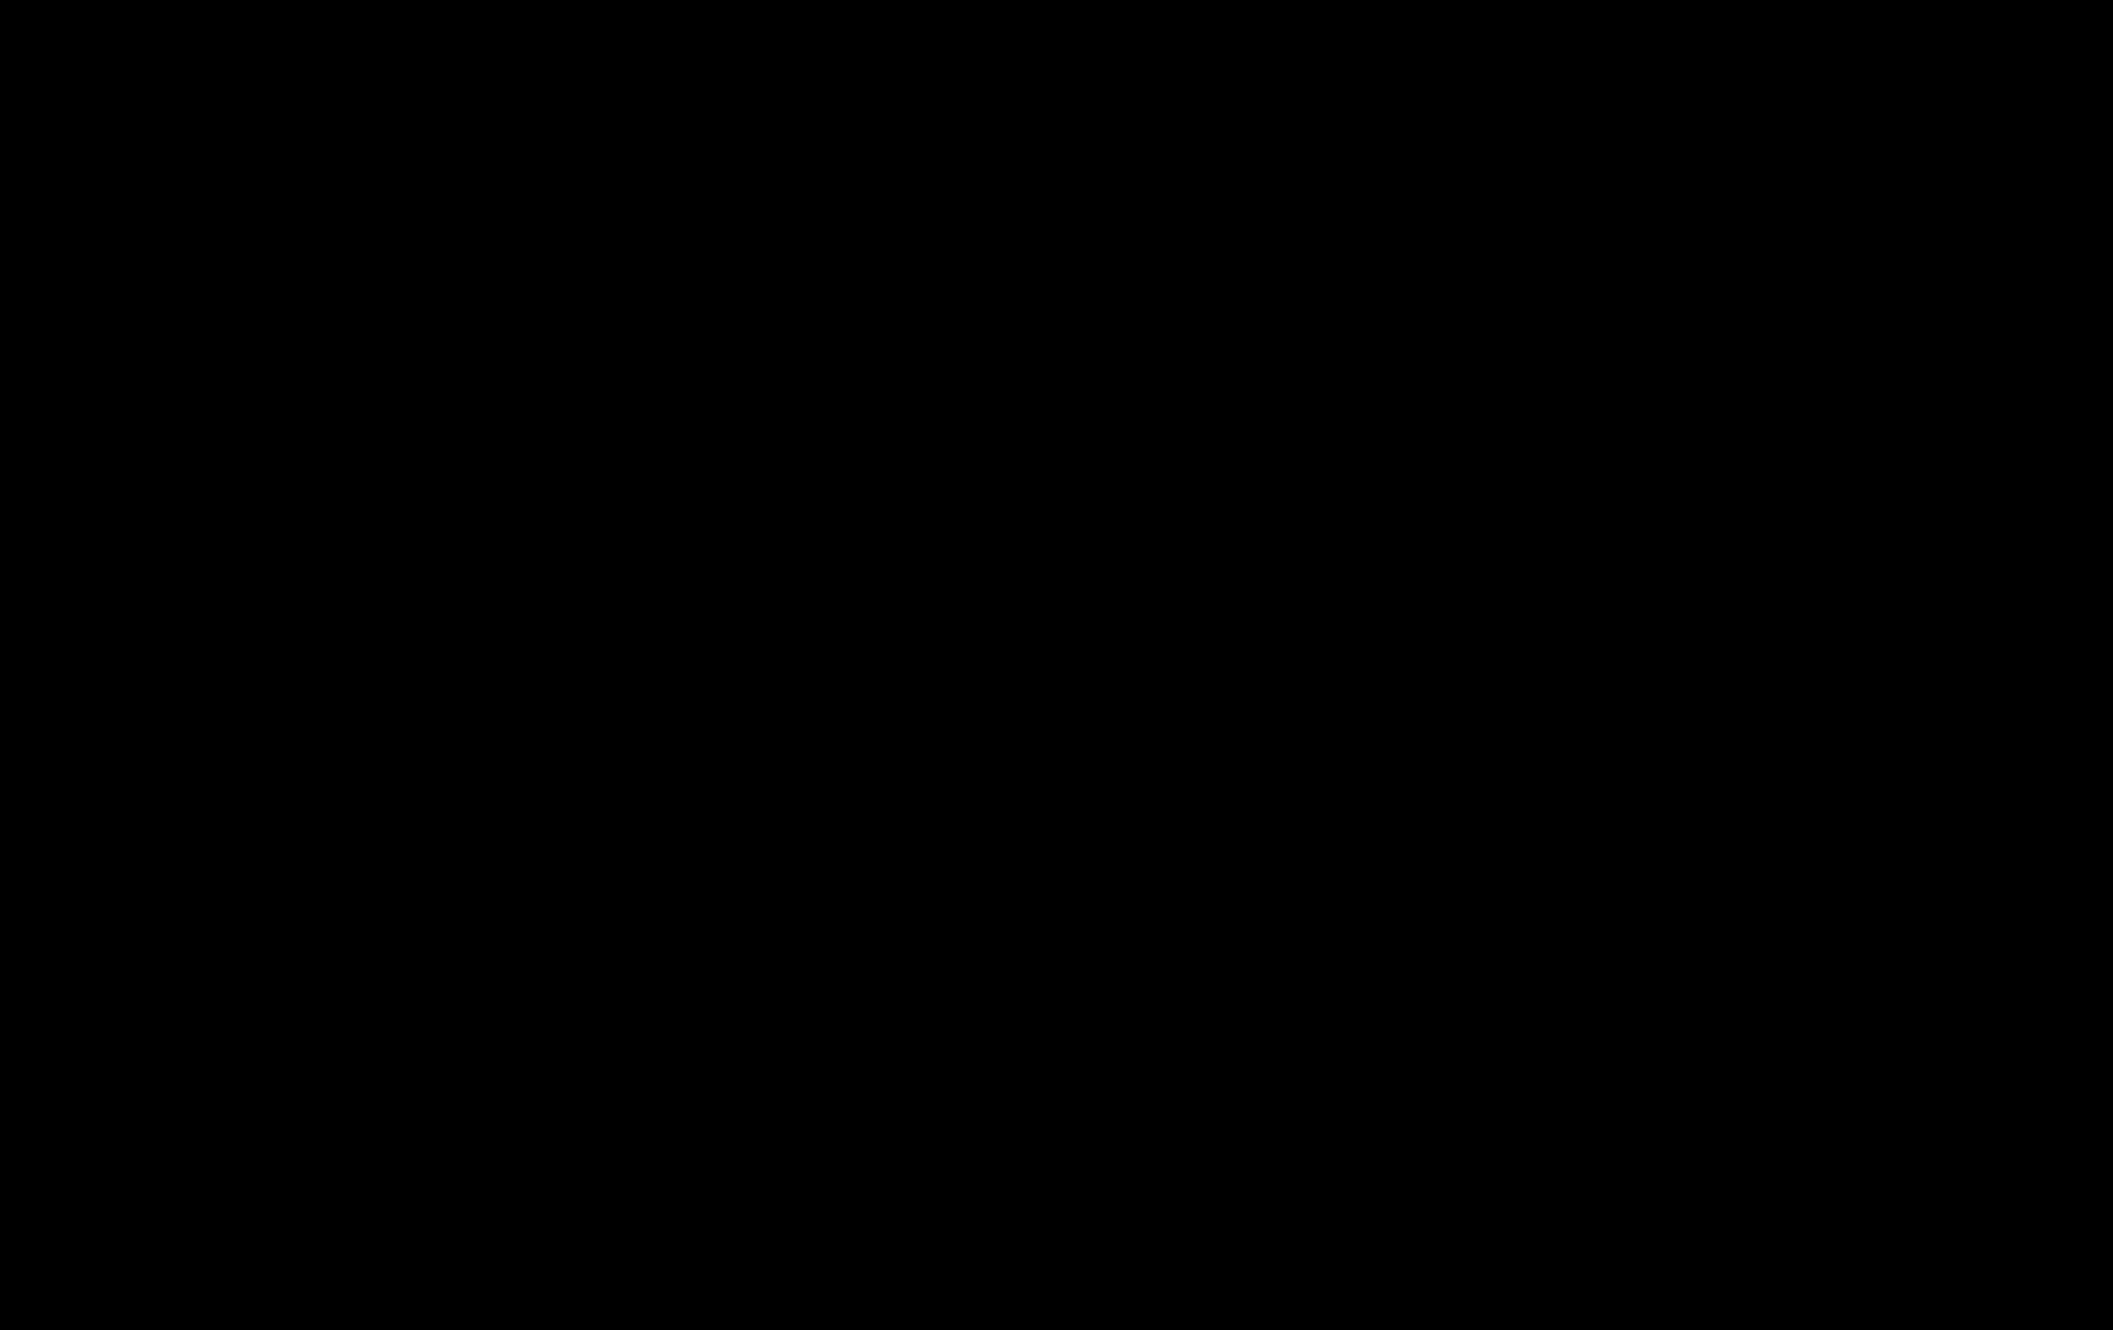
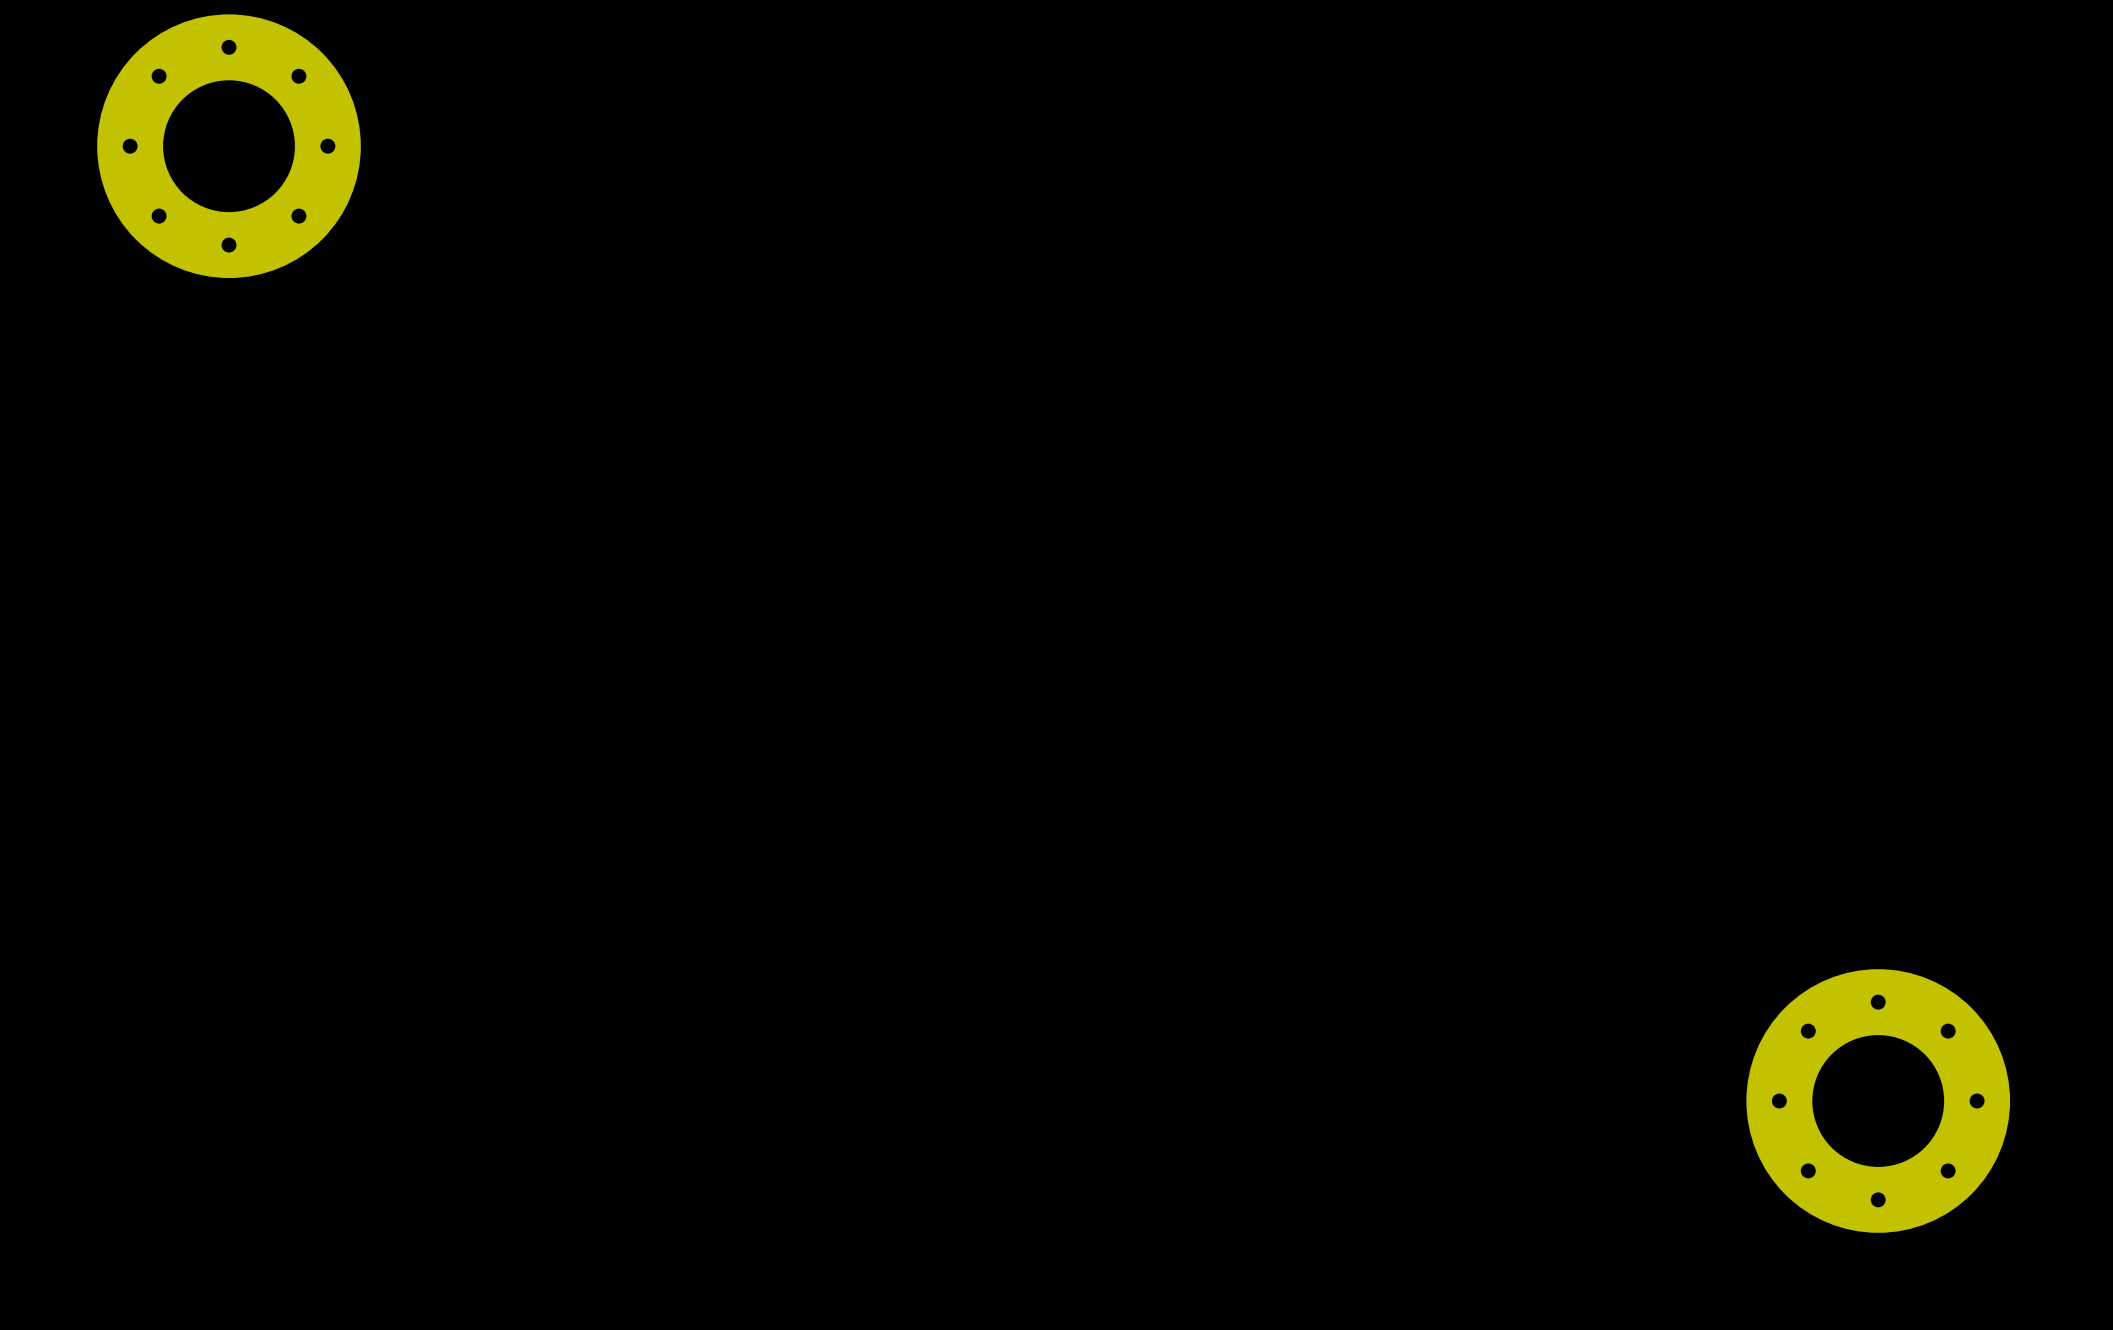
part: none -> (229, 146)
part: none -> (1878, 1101)

